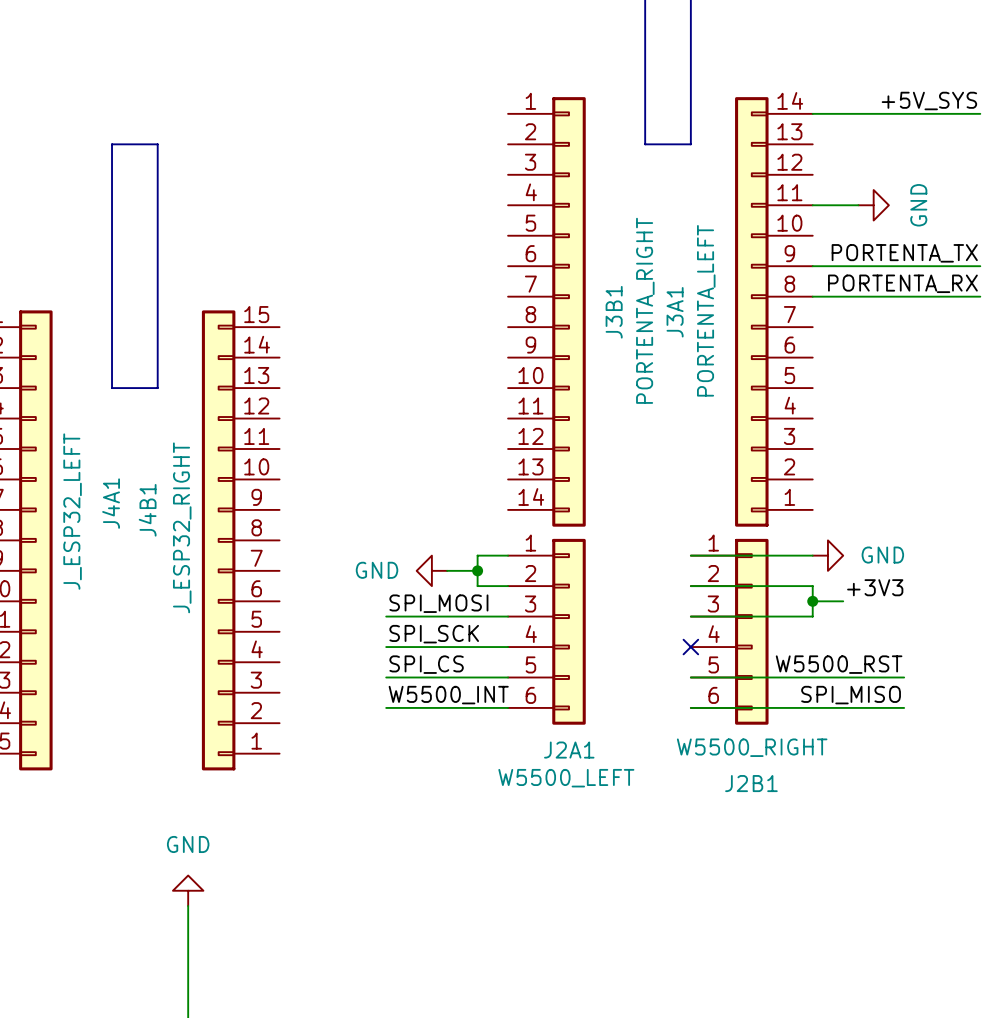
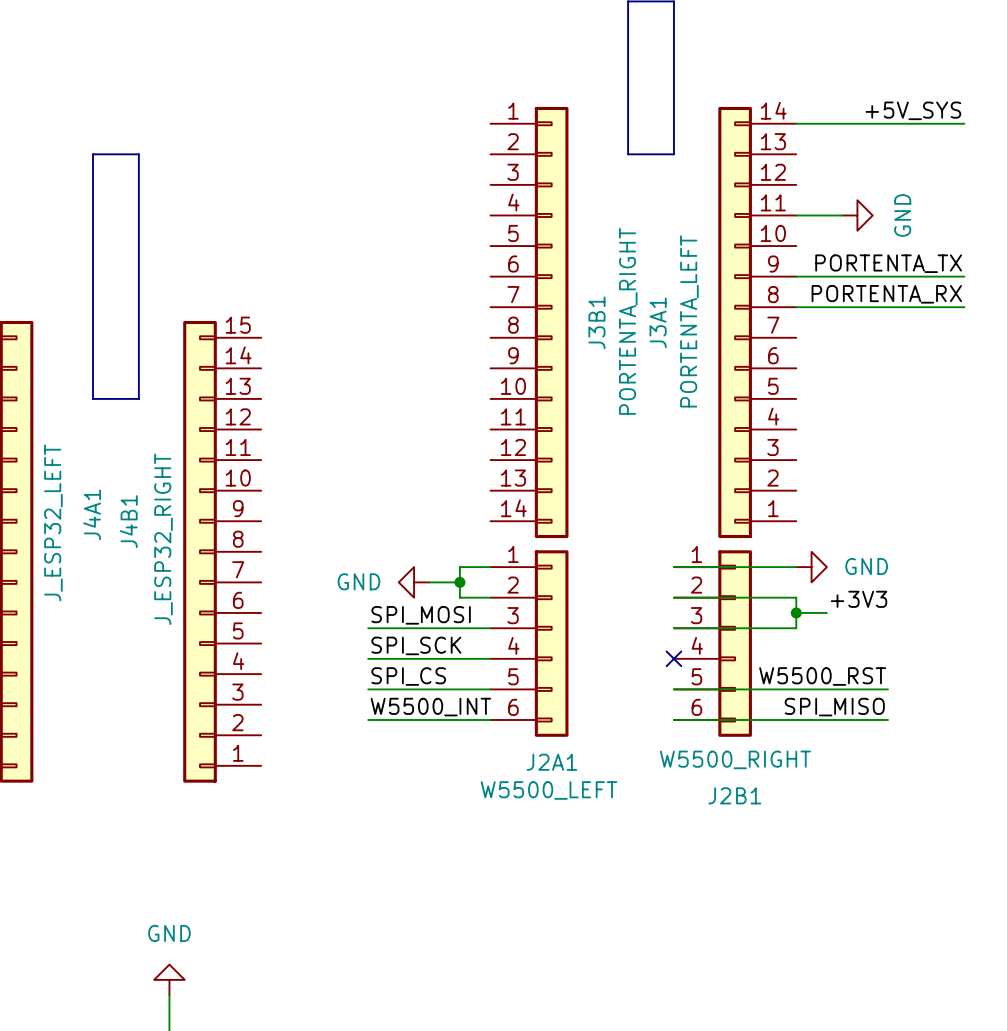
power symbol position: GND (188, 890) -> GND (169, 979)
wire: (188, 905) (188, 982) -> none

